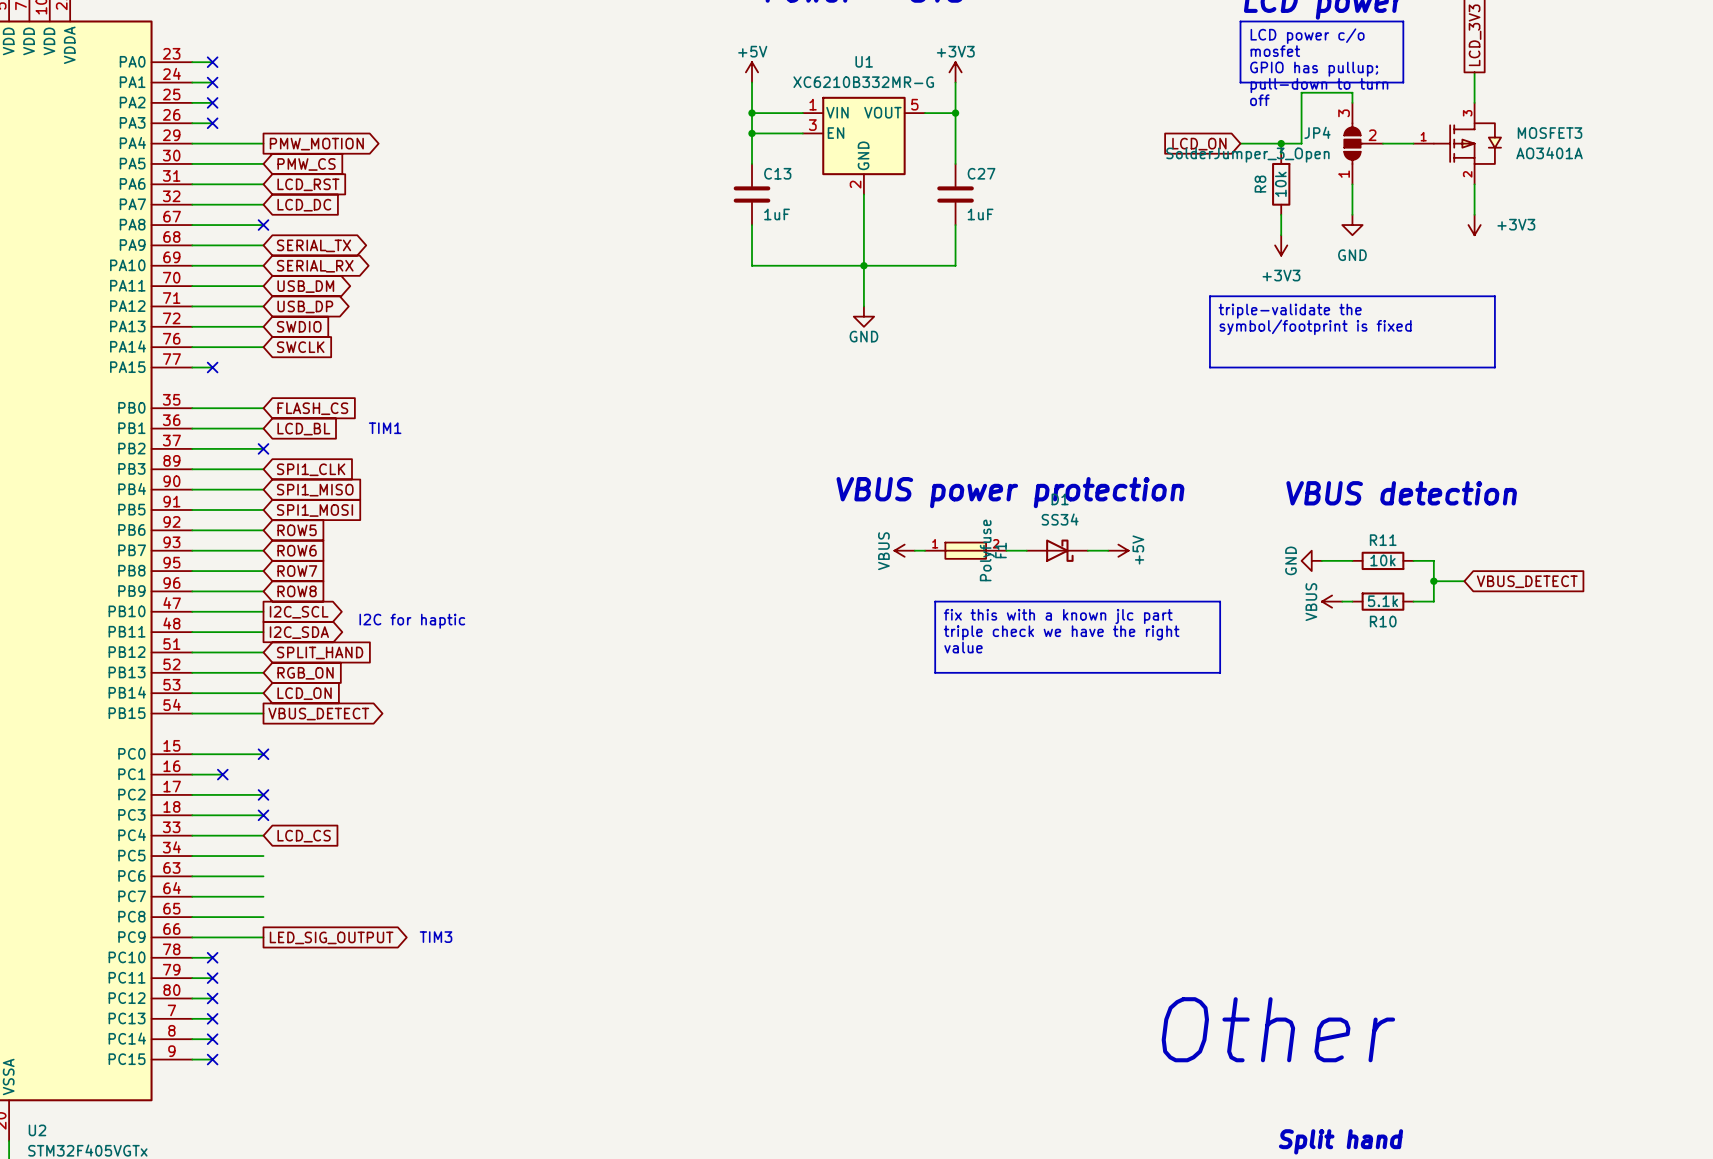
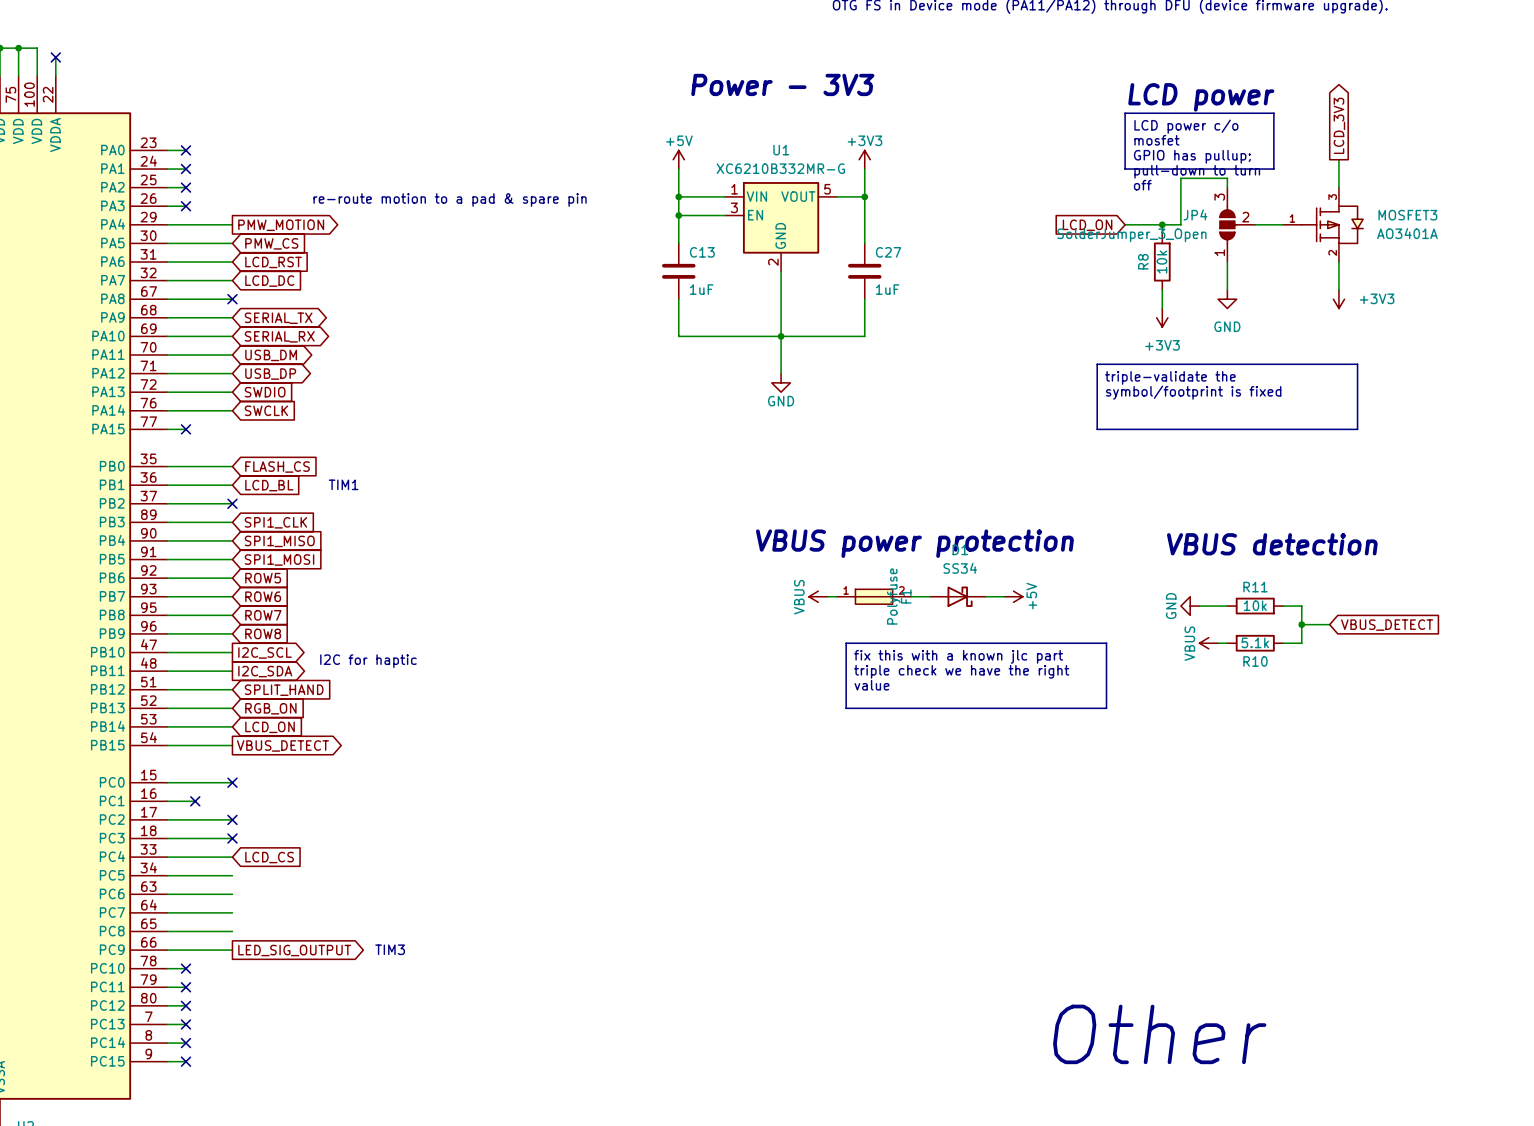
text: none -> re-route motion to a pad & spare pin (450, 200)

